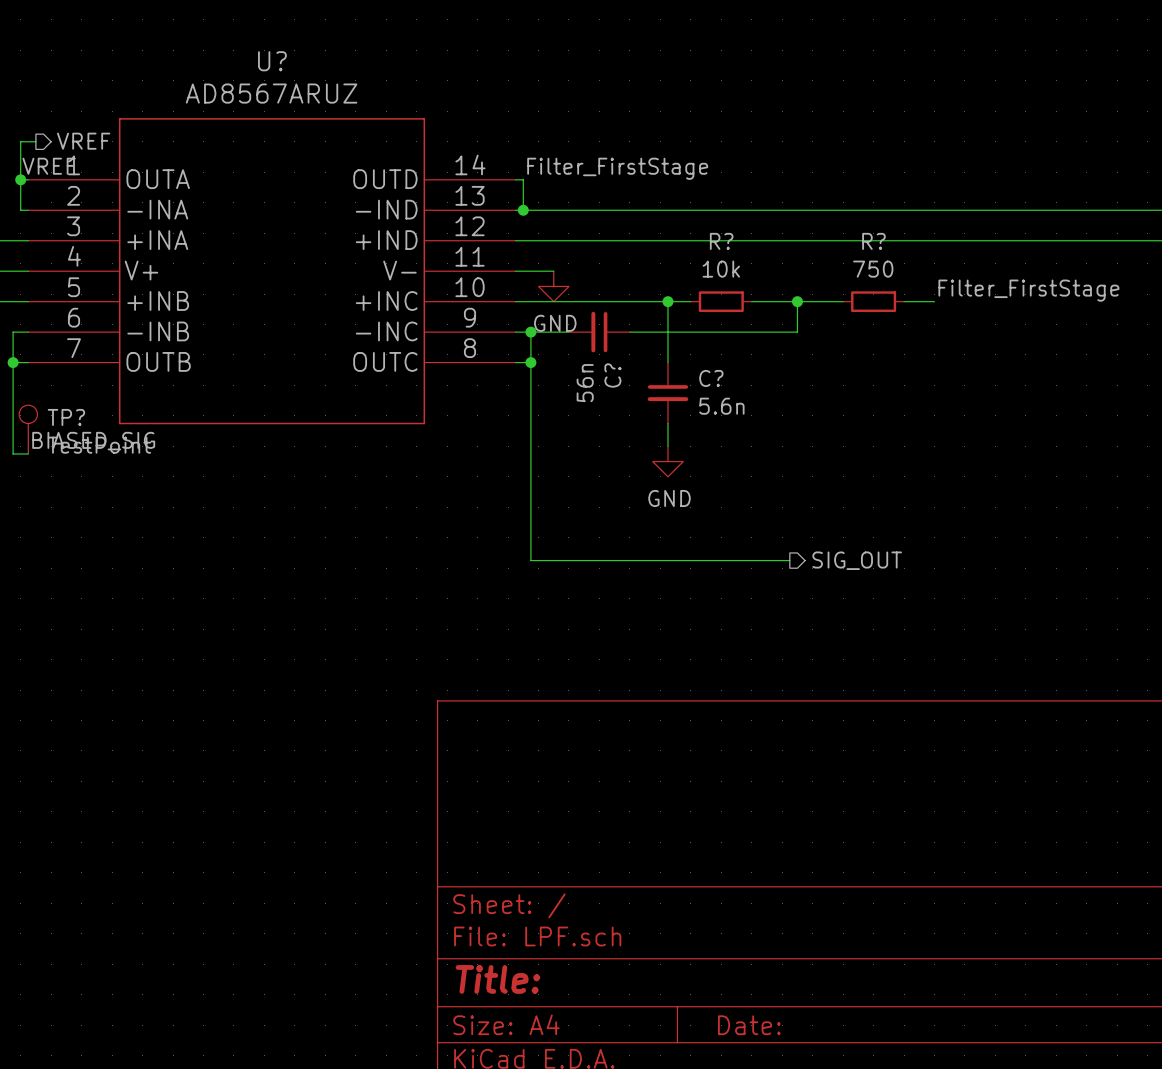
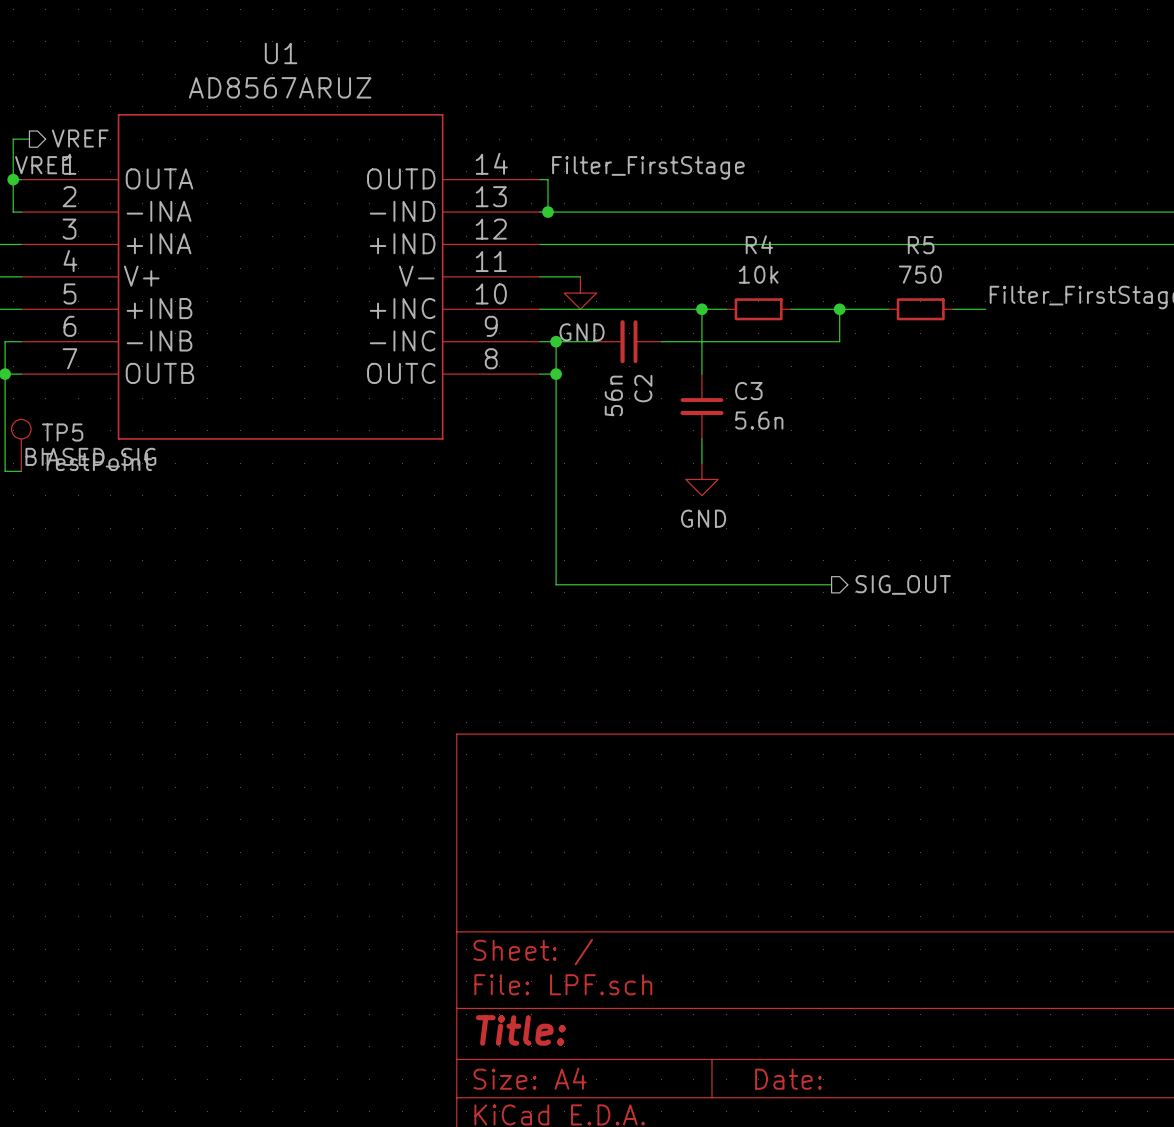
U? name: U? (272, 61) -> U1 (281, 53)
R? name: R? (721, 241) -> R4 (759, 244)
R? name: R? (873, 241) -> R5 (921, 245)
C? name: C? (612, 375) -> C2 (643, 388)
C? name: C? (711, 378) -> C3 (748, 391)
TP? name: TP? (66, 417) -> TP5 (62, 432)

